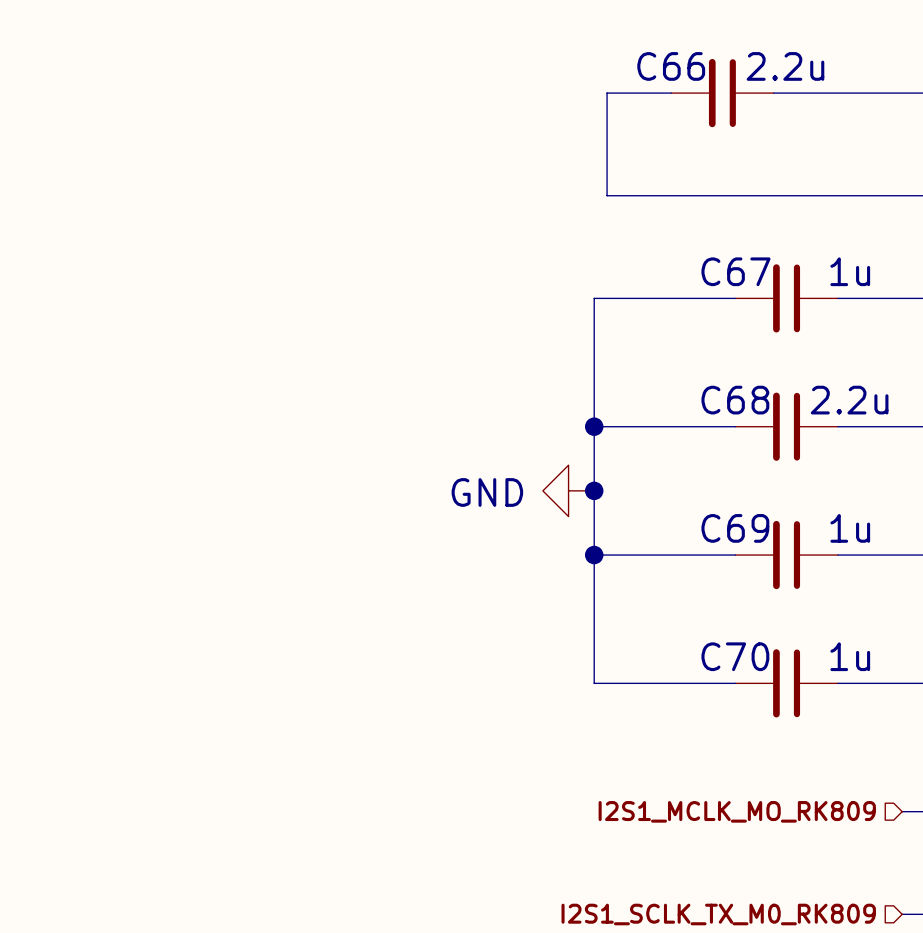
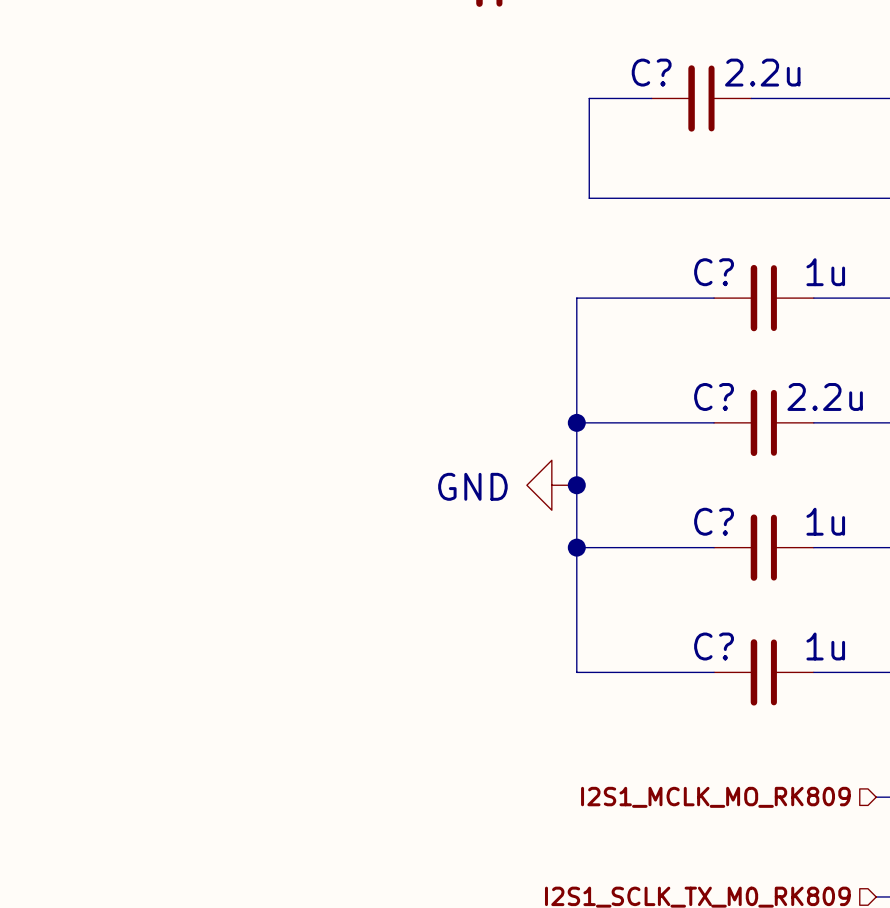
C66 name: C66 (671, 66) -> C? (651, 72)
C67 name: C67 (735, 271) -> C? (714, 272)
C68 name: C68 (735, 400) -> C? (714, 396)
C69 name: C69 (735, 528) -> C? (714, 521)
C70 name: C70 (735, 656) -> C? (714, 646)

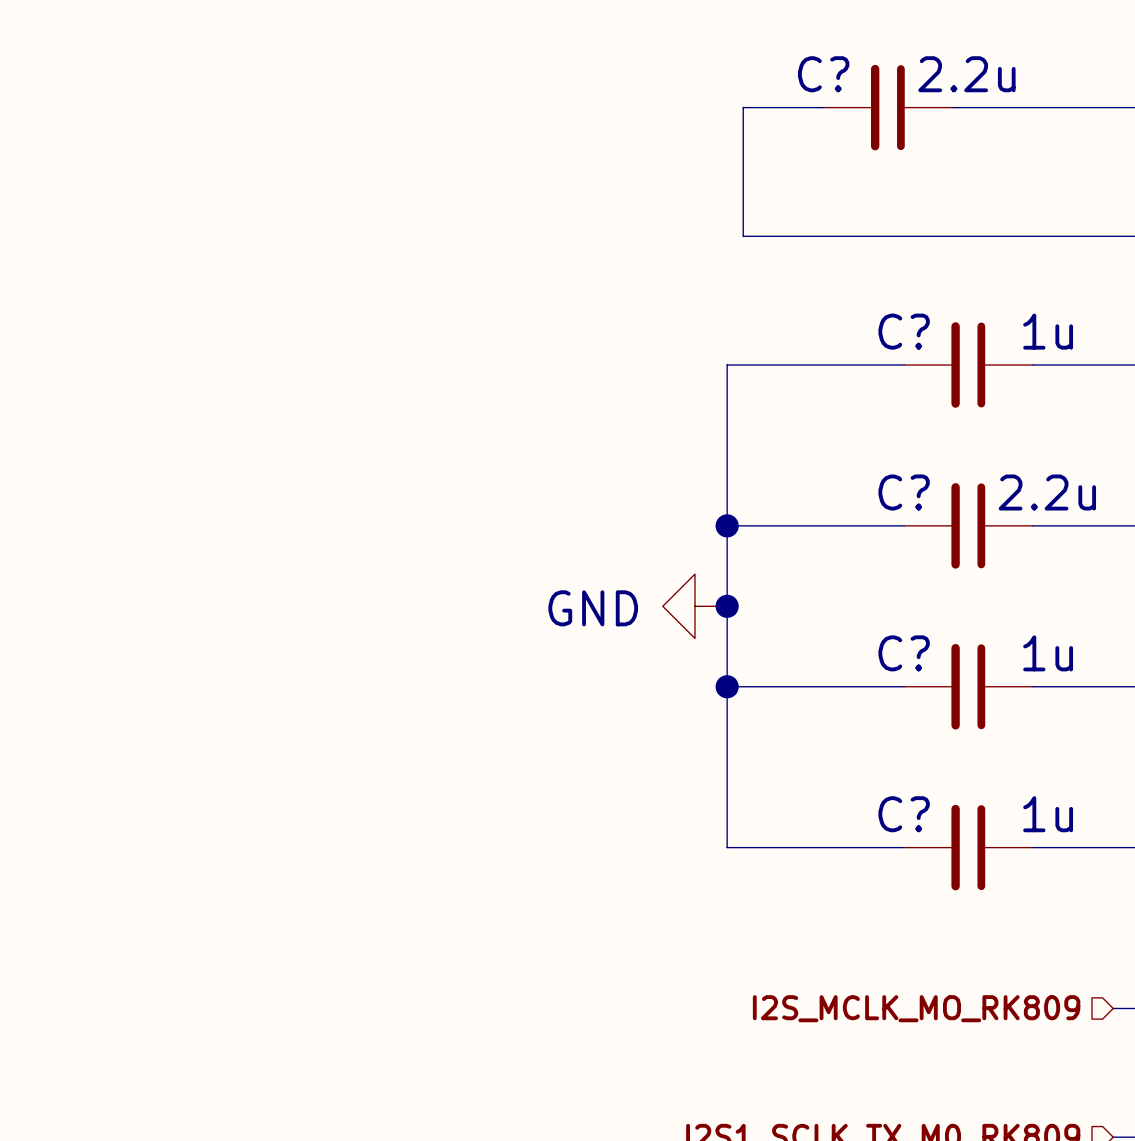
hierarchical label: I2S1_MCLK_MO_RK809 (715, 797) -> I2S_MCLK_MO_RK809 (916, 1008)

